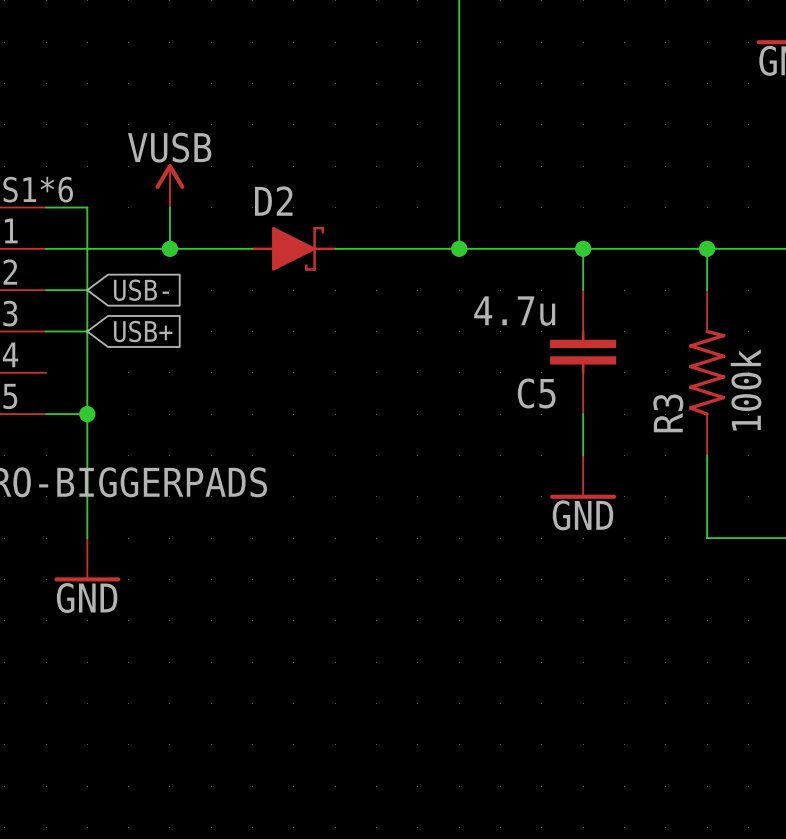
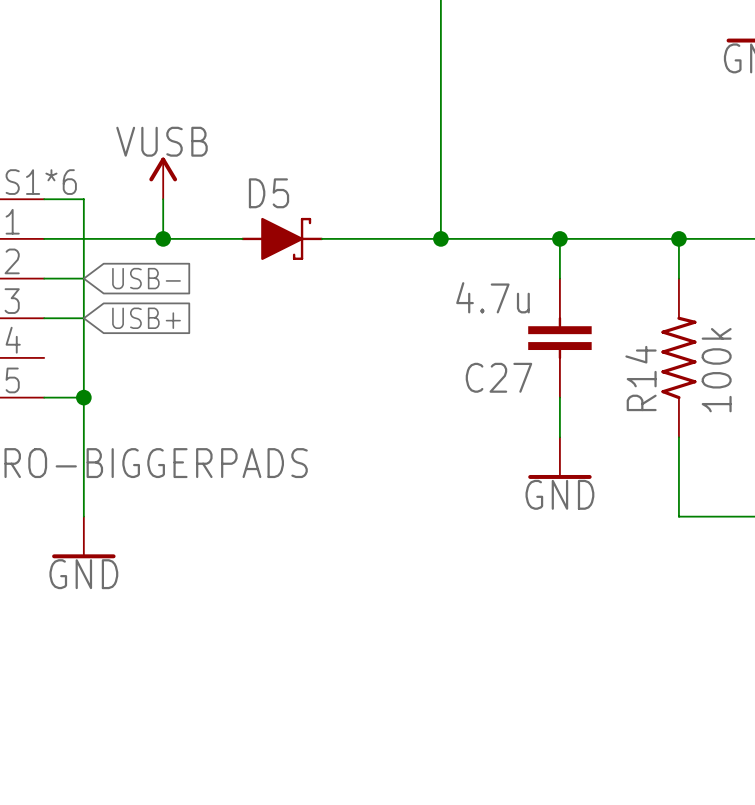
D2 name: D2 (273, 201) -> D5 (269, 193)
C5 name: C5 (536, 393) -> C27 (498, 377)
R3 name: R3 (668, 413) -> R14 (641, 378)

